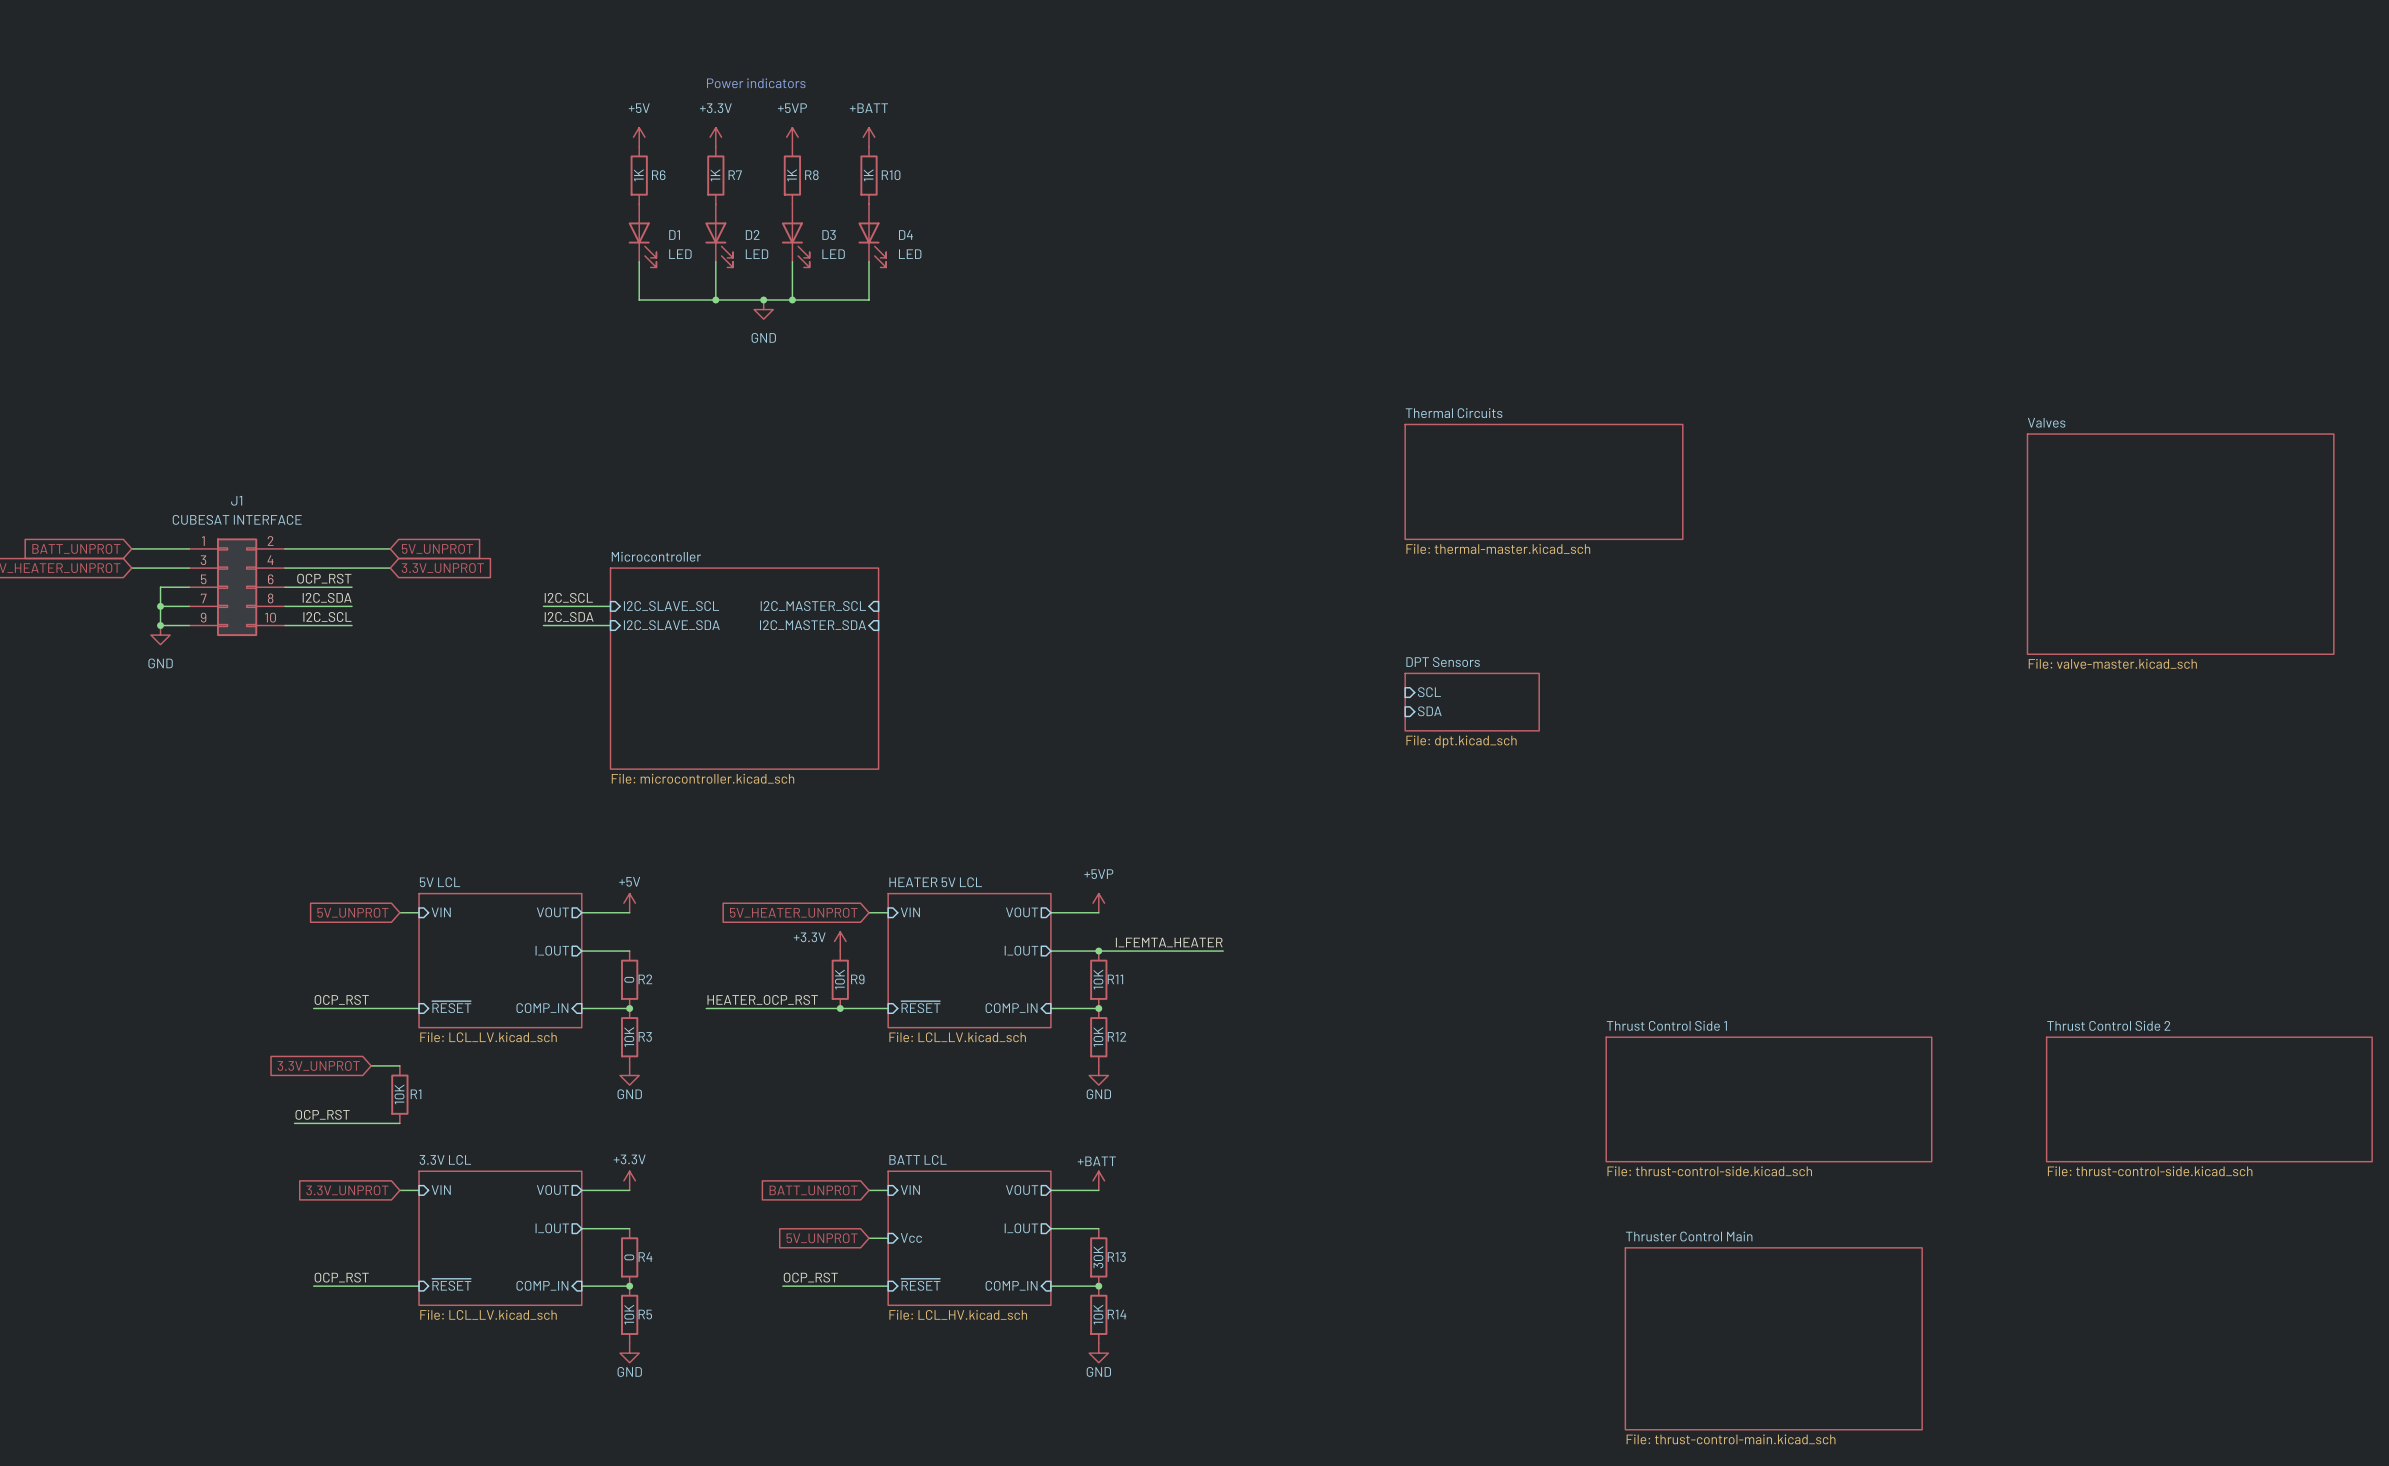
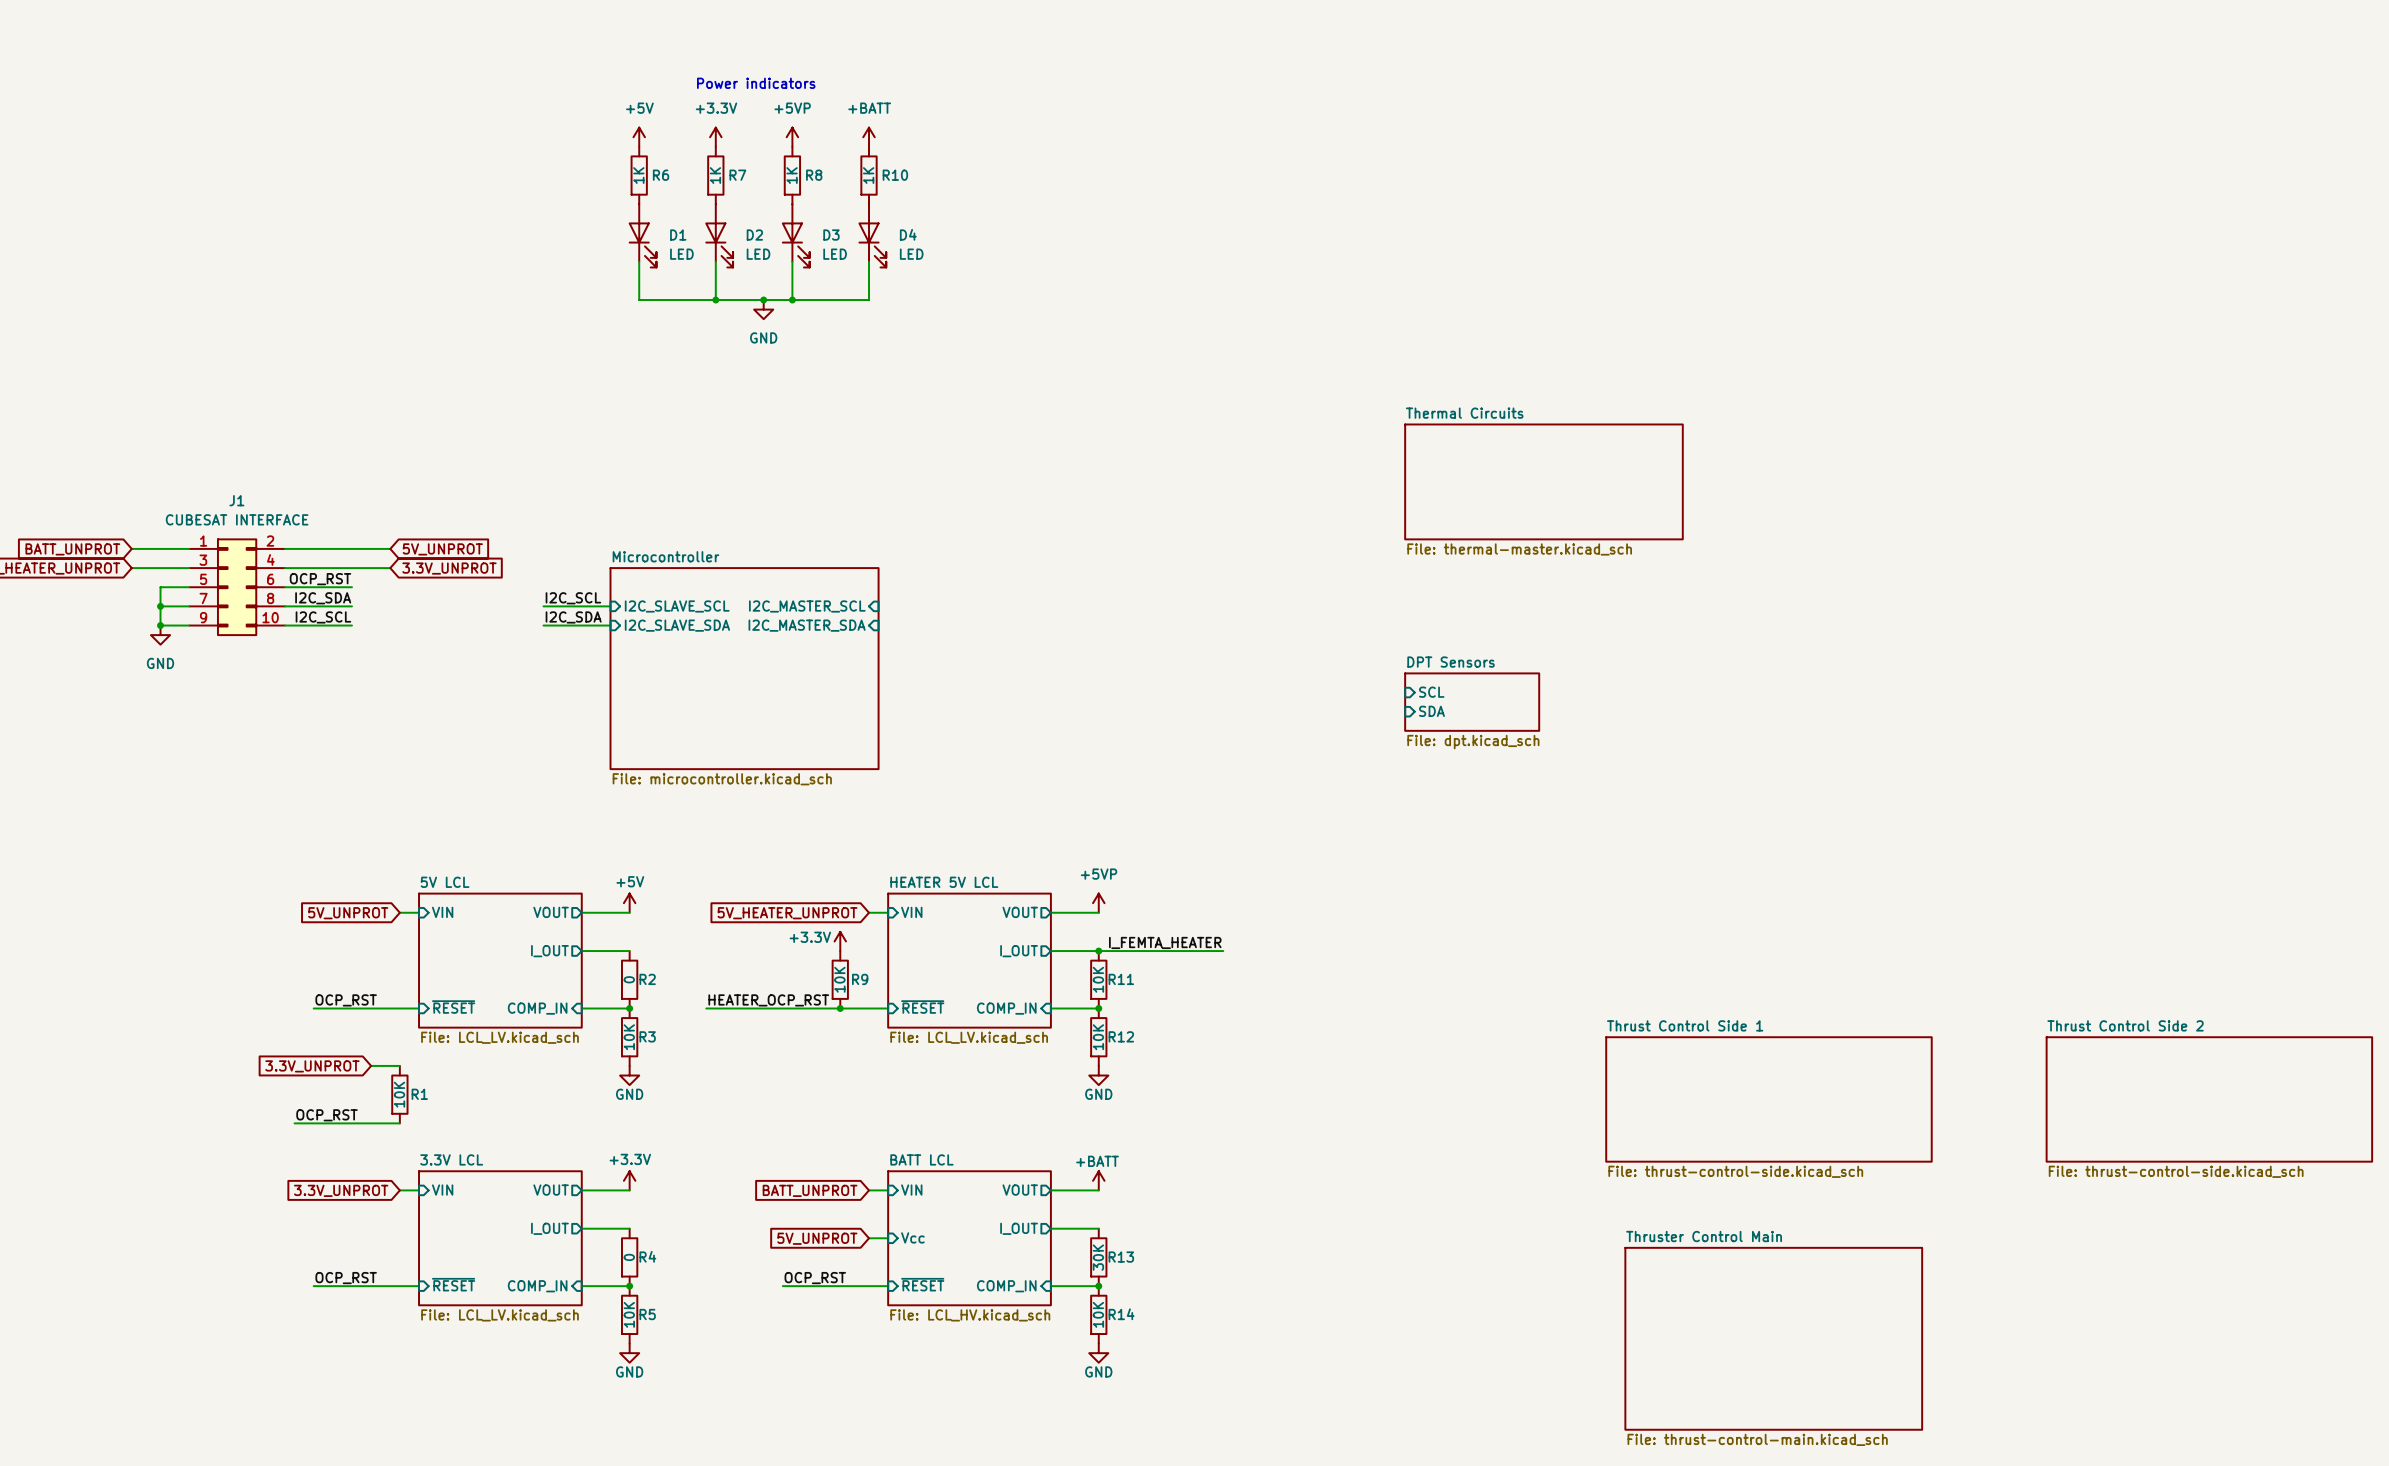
sheet Valves: File: valve-master.kicad_sch (2180, 544) -> none

